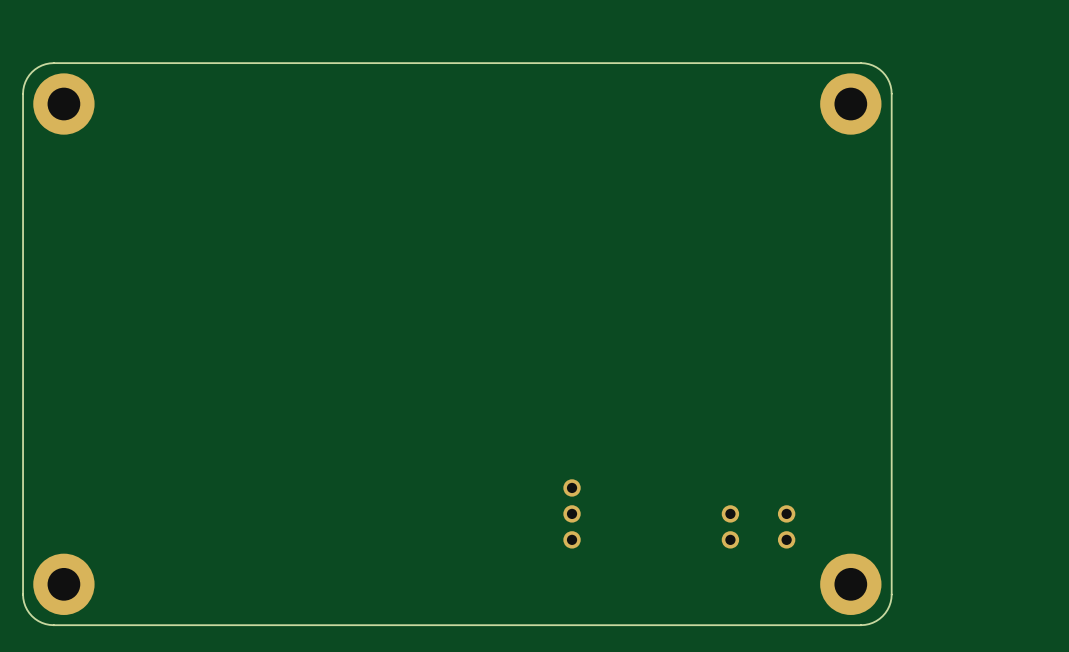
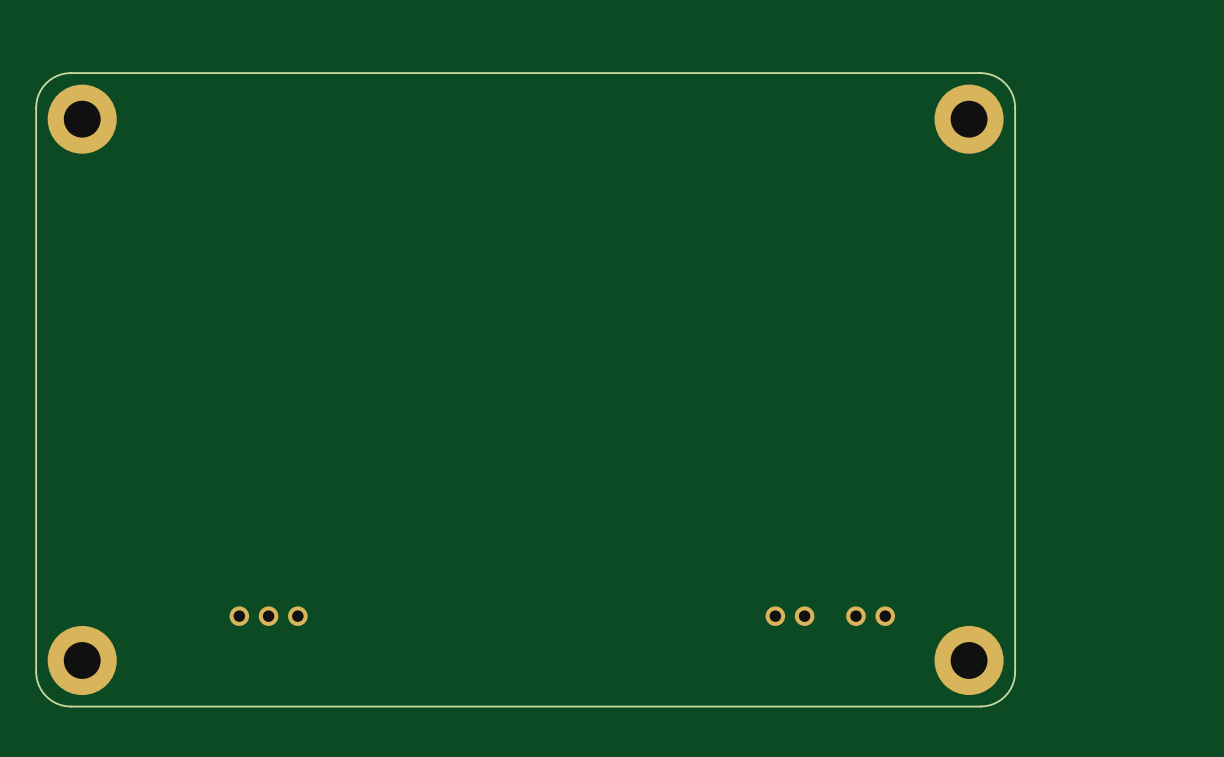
part: (572, 513) -> none
part: (730, 526) -> none
part: (786, 526) -> none
part: none -> (268, 616)
part: none -> (789, 616)
part: none -> (870, 616)

